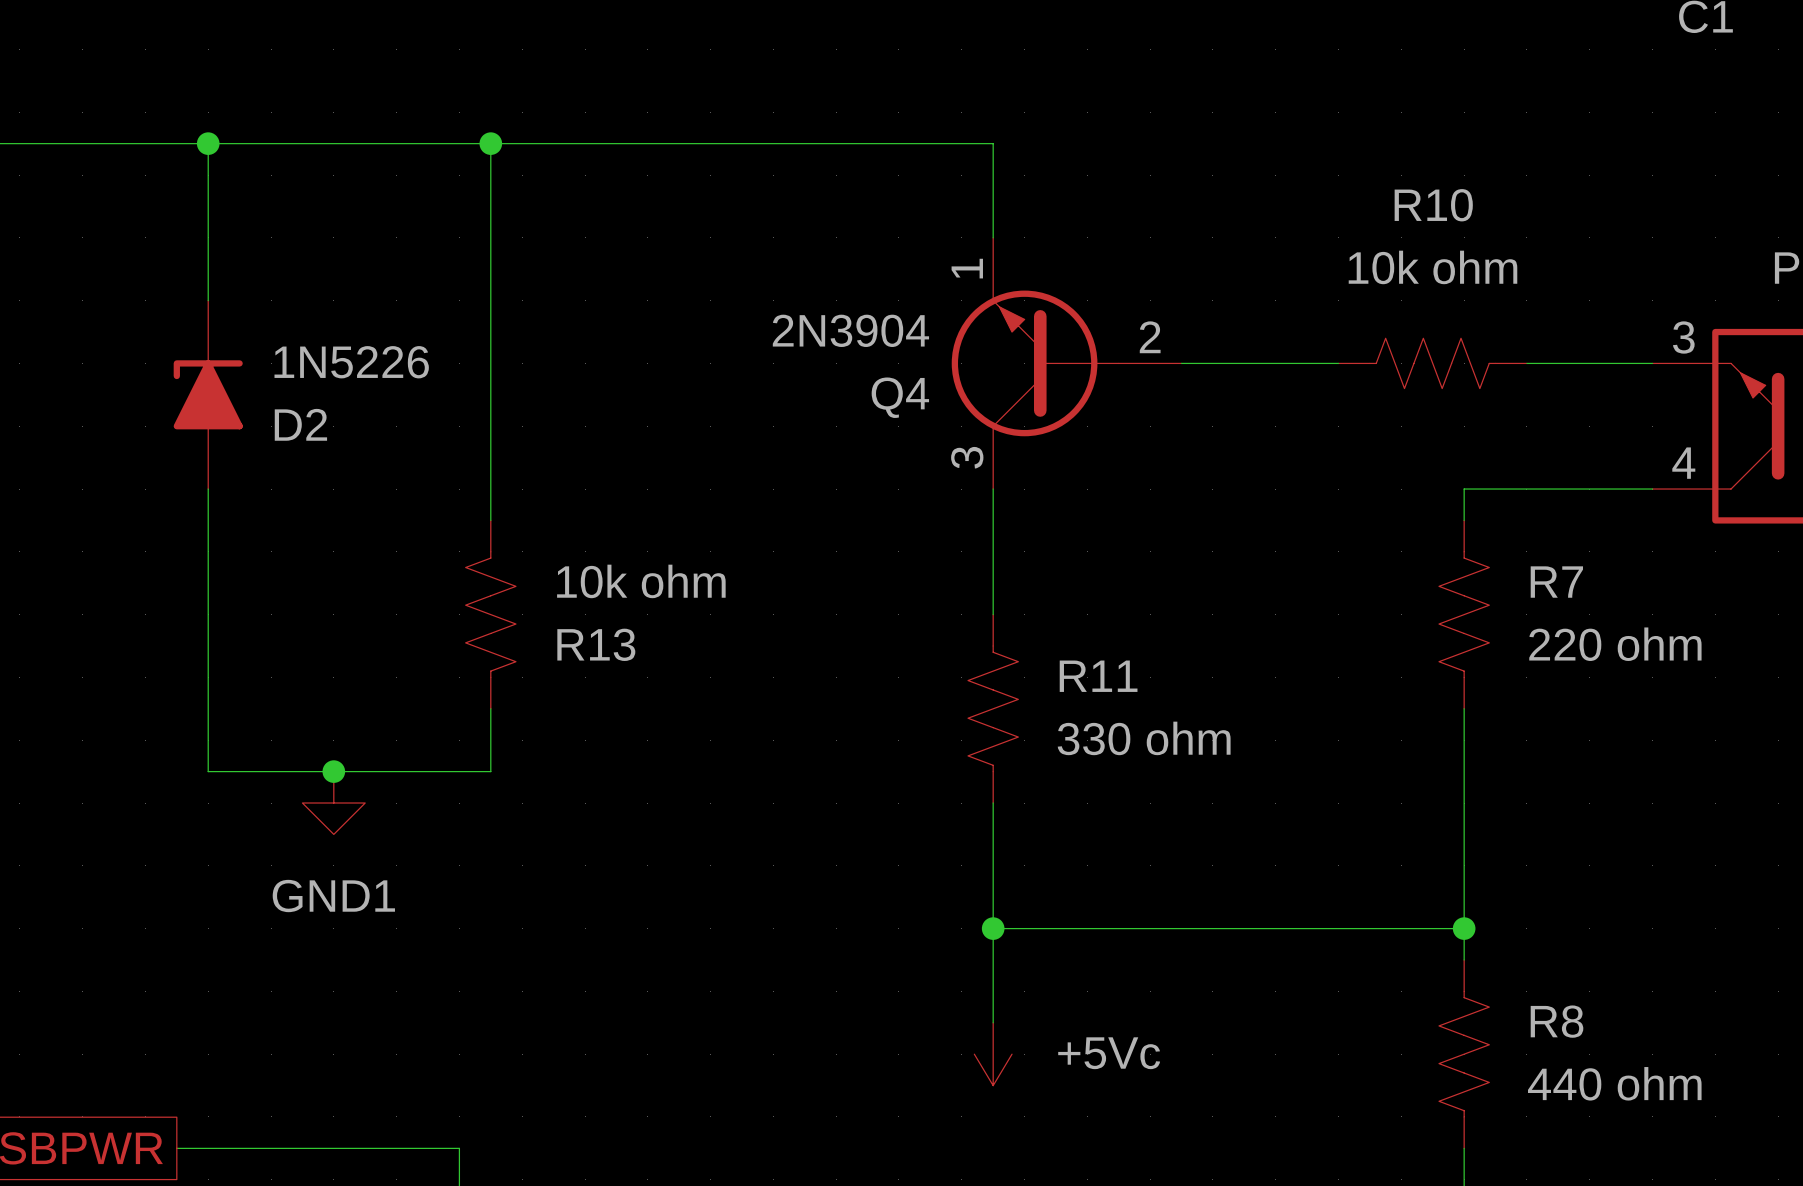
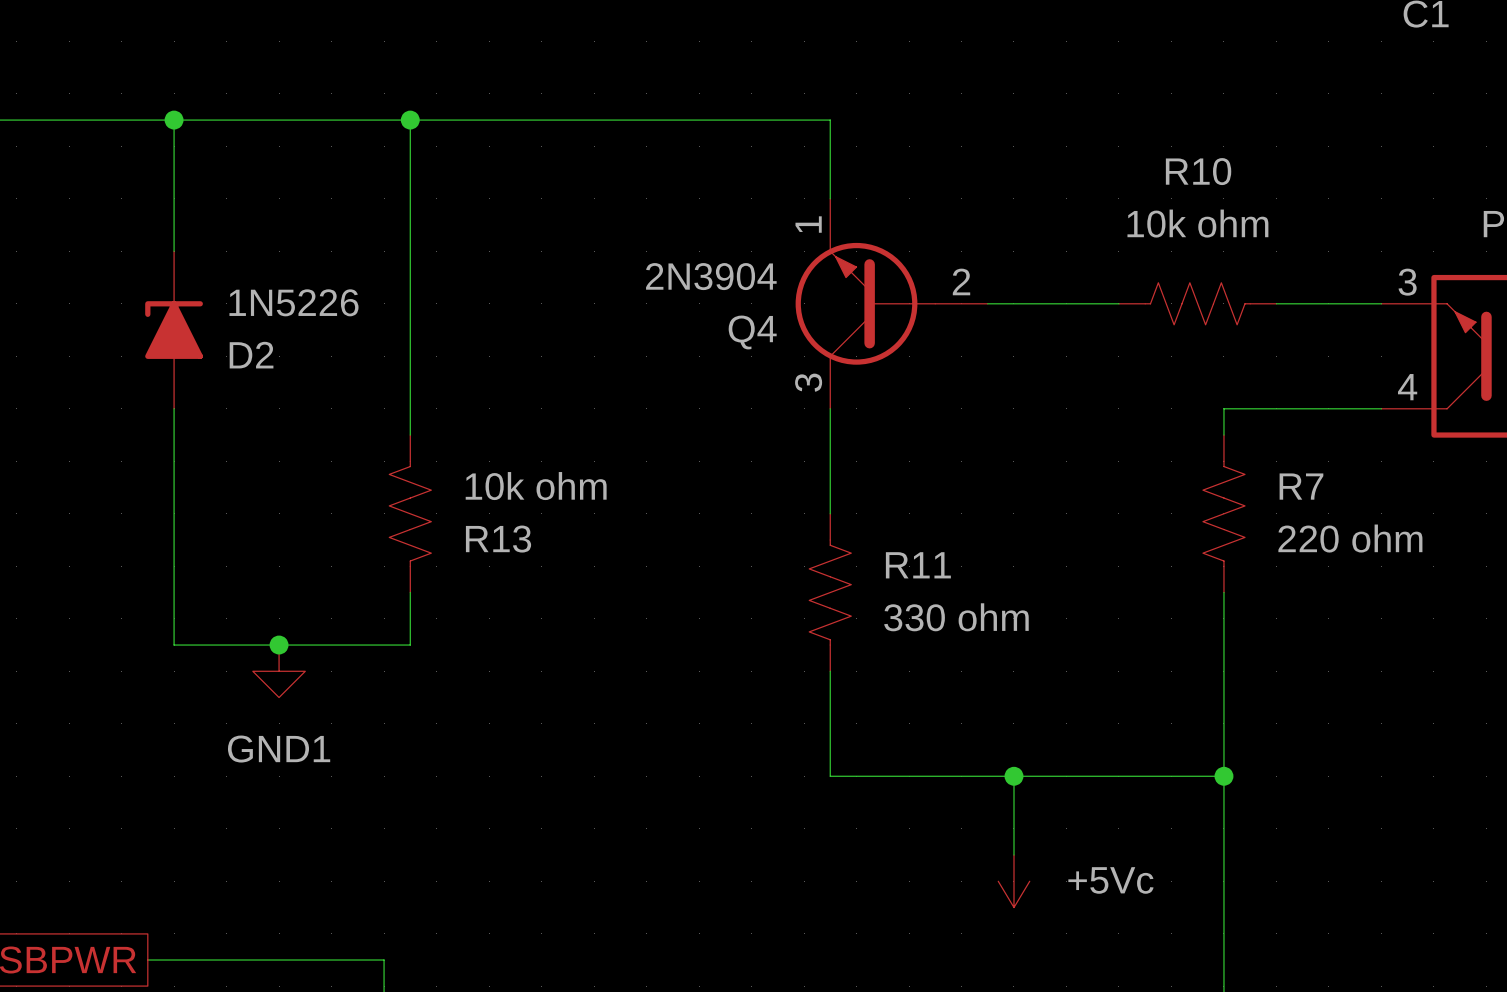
wire: (993, 928) (993, 1022) -> (1013, 776) (1013, 855)
junction: (993, 928) -> none
junction: none -> (1013, 776)
wire: none -> (1223, 802) (1223, 960)
power symbol position: +5Vc (993, 1054) -> +5Vc (1013, 881)
R8: 440 ohm (1464, 1054) -> none

